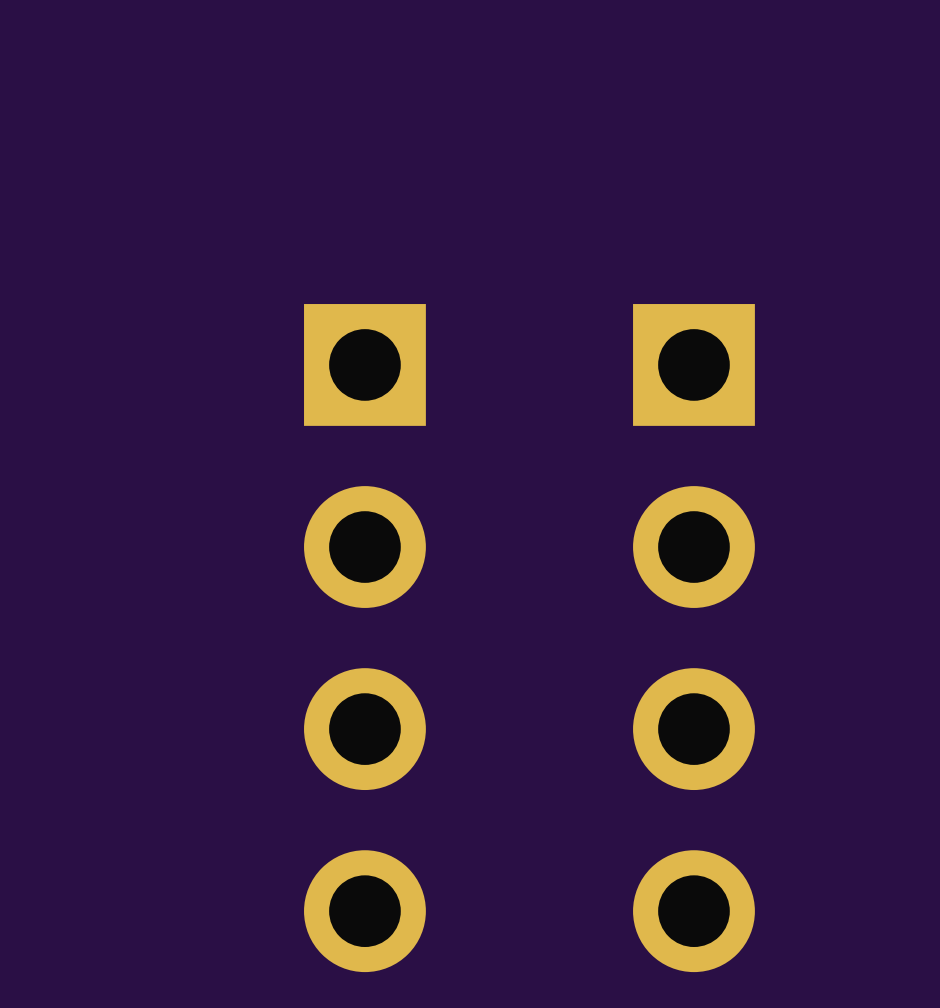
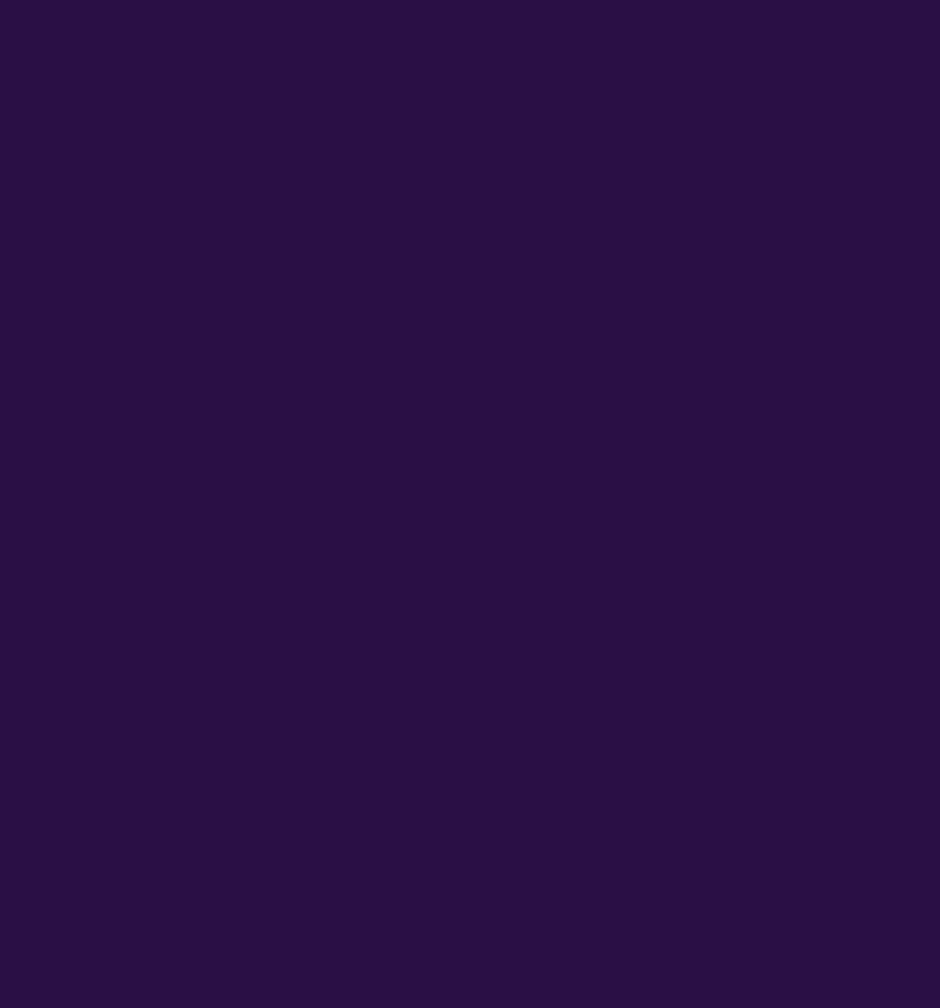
part: (364, 638) -> none
part: (693, 638) -> none

